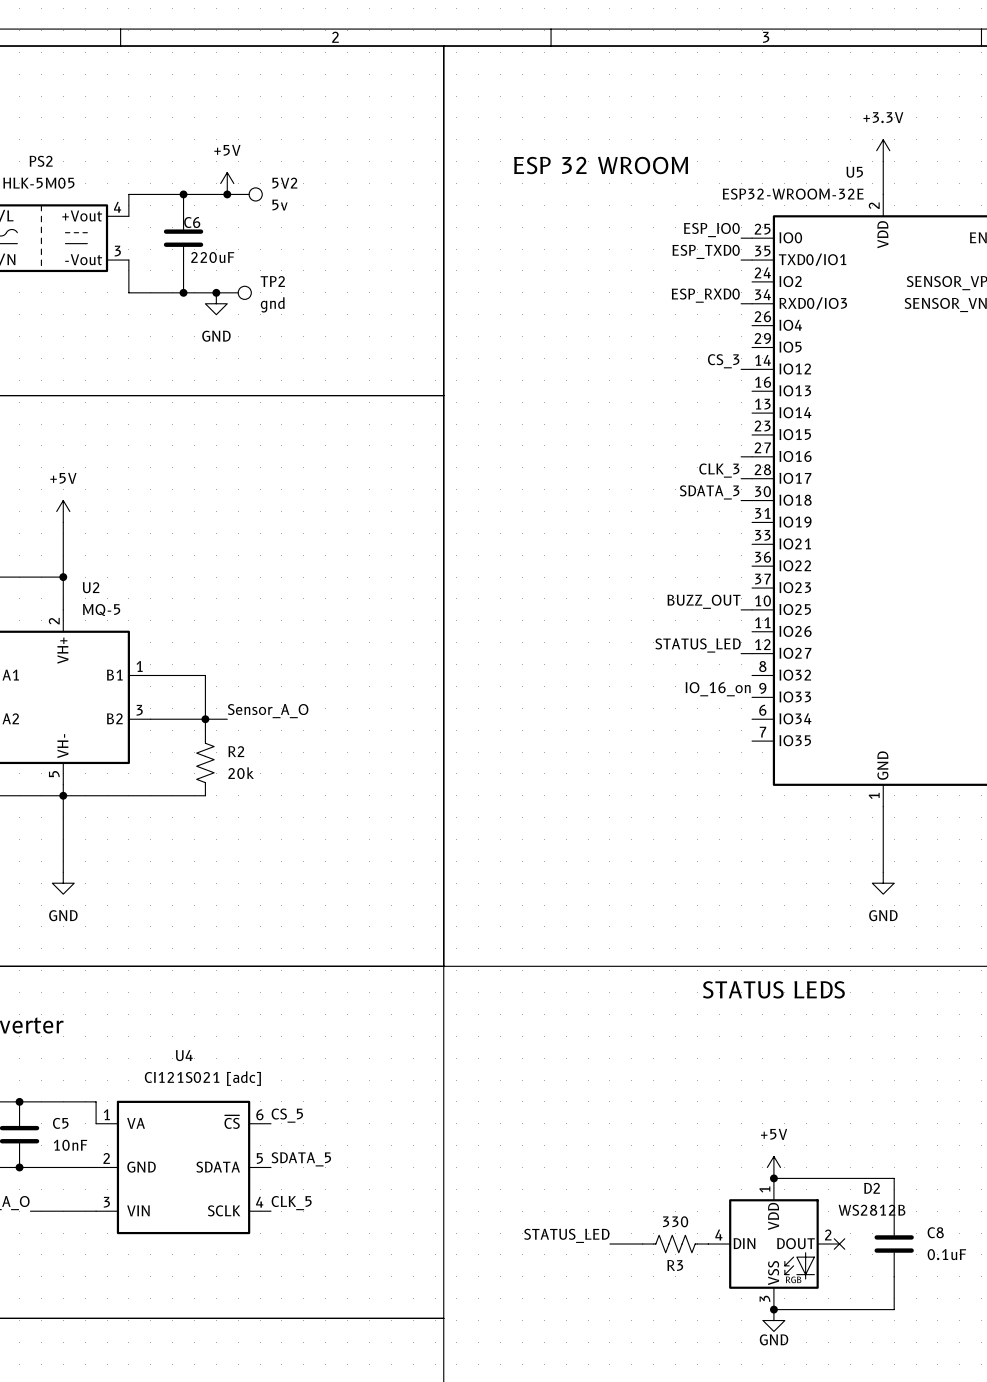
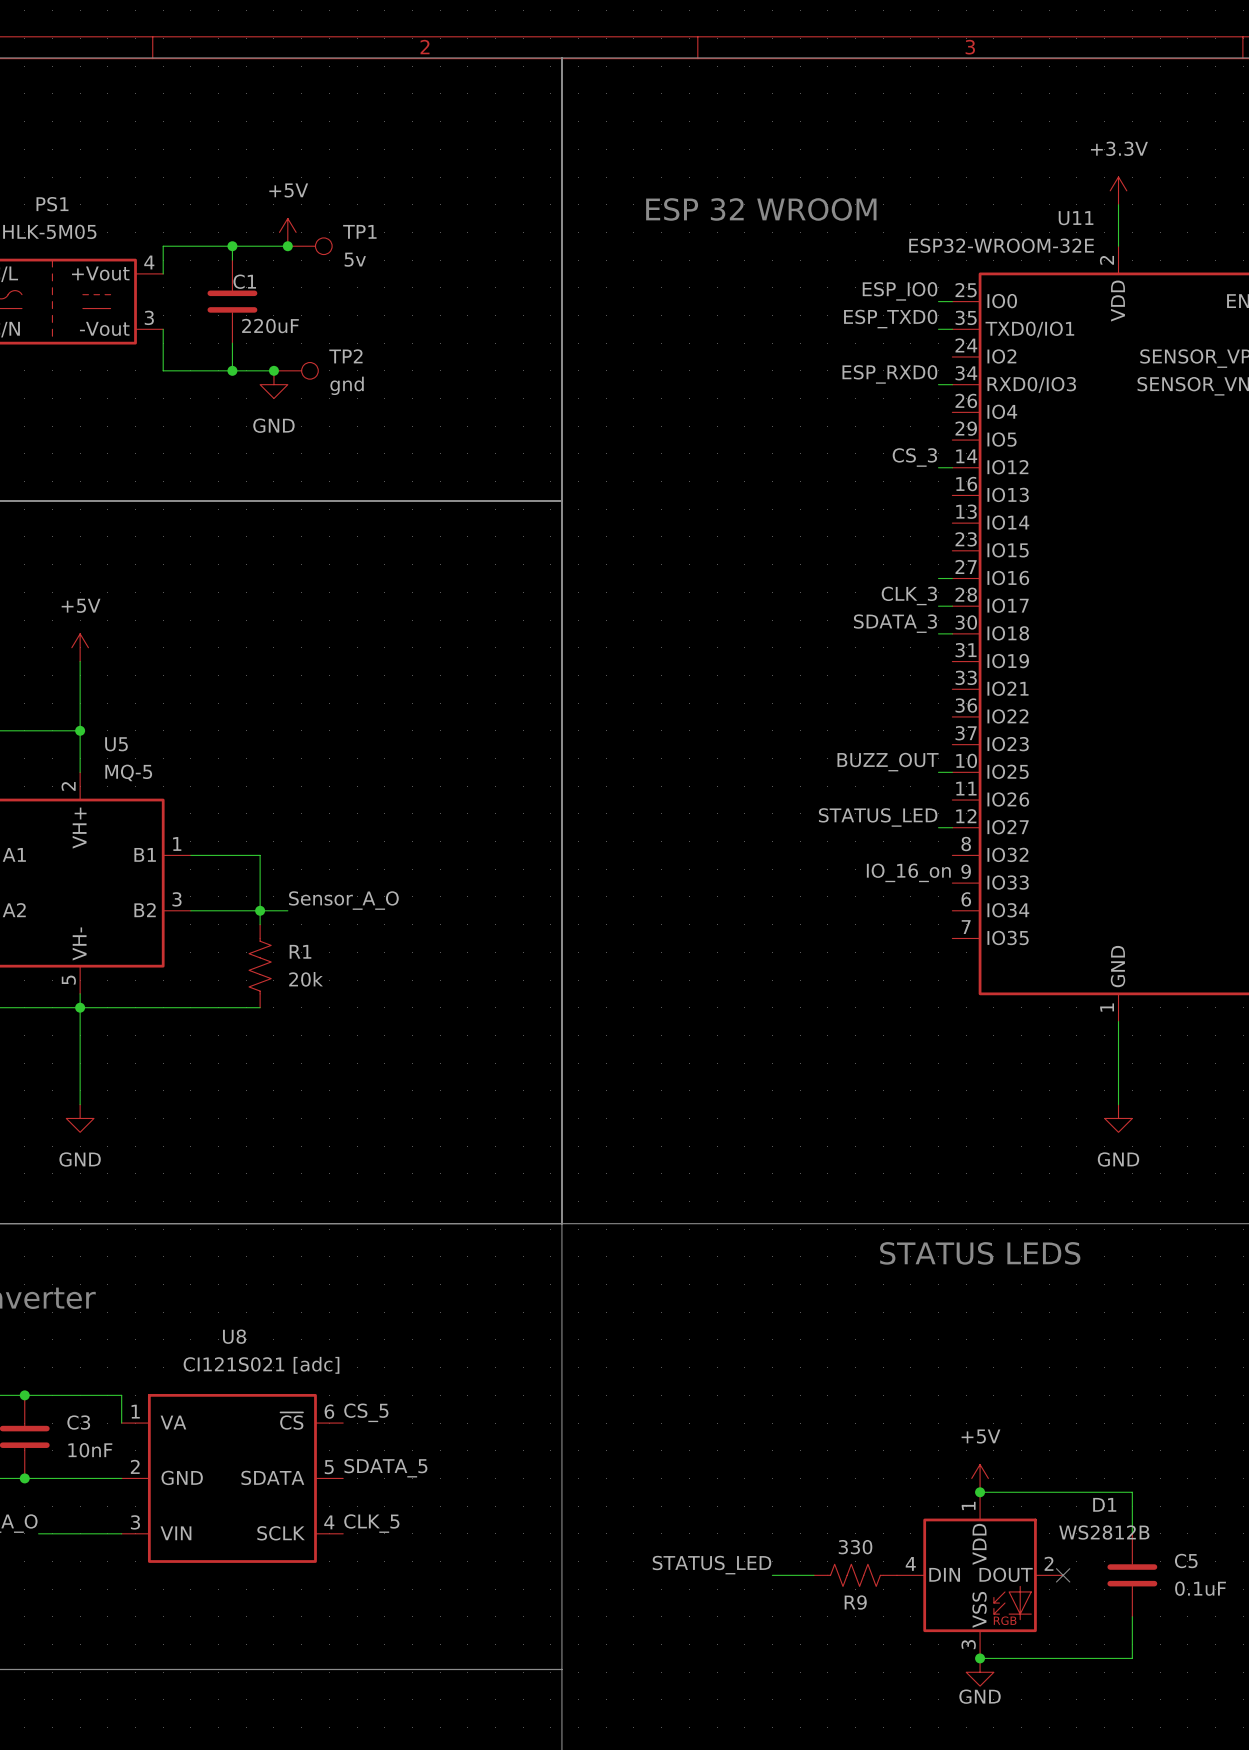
PS2 name: PS2 (41, 161) -> PS1 (52, 204)
U5 name: U5 (854, 172) -> U11 (1076, 218)
5V2 name: 5V2 (284, 183) -> TP1 (359, 231)
C6 name: C6 (192, 222) -> C1 (244, 281)
U2 name: U2 (91, 587) -> U5 (116, 744)
R2 name: R2 (236, 751) -> R1 (300, 951)
U4 name: U4 (184, 1055) -> U8 (234, 1336)
C5 name: C5 (60, 1123) -> C3 (78, 1422)
D2 name: D2 (872, 1188) -> D1 (1104, 1504)
C8 name: C8 (935, 1232) -> C5 (1186, 1560)
R3 name: R3 (675, 1265) -> R9 (855, 1602)

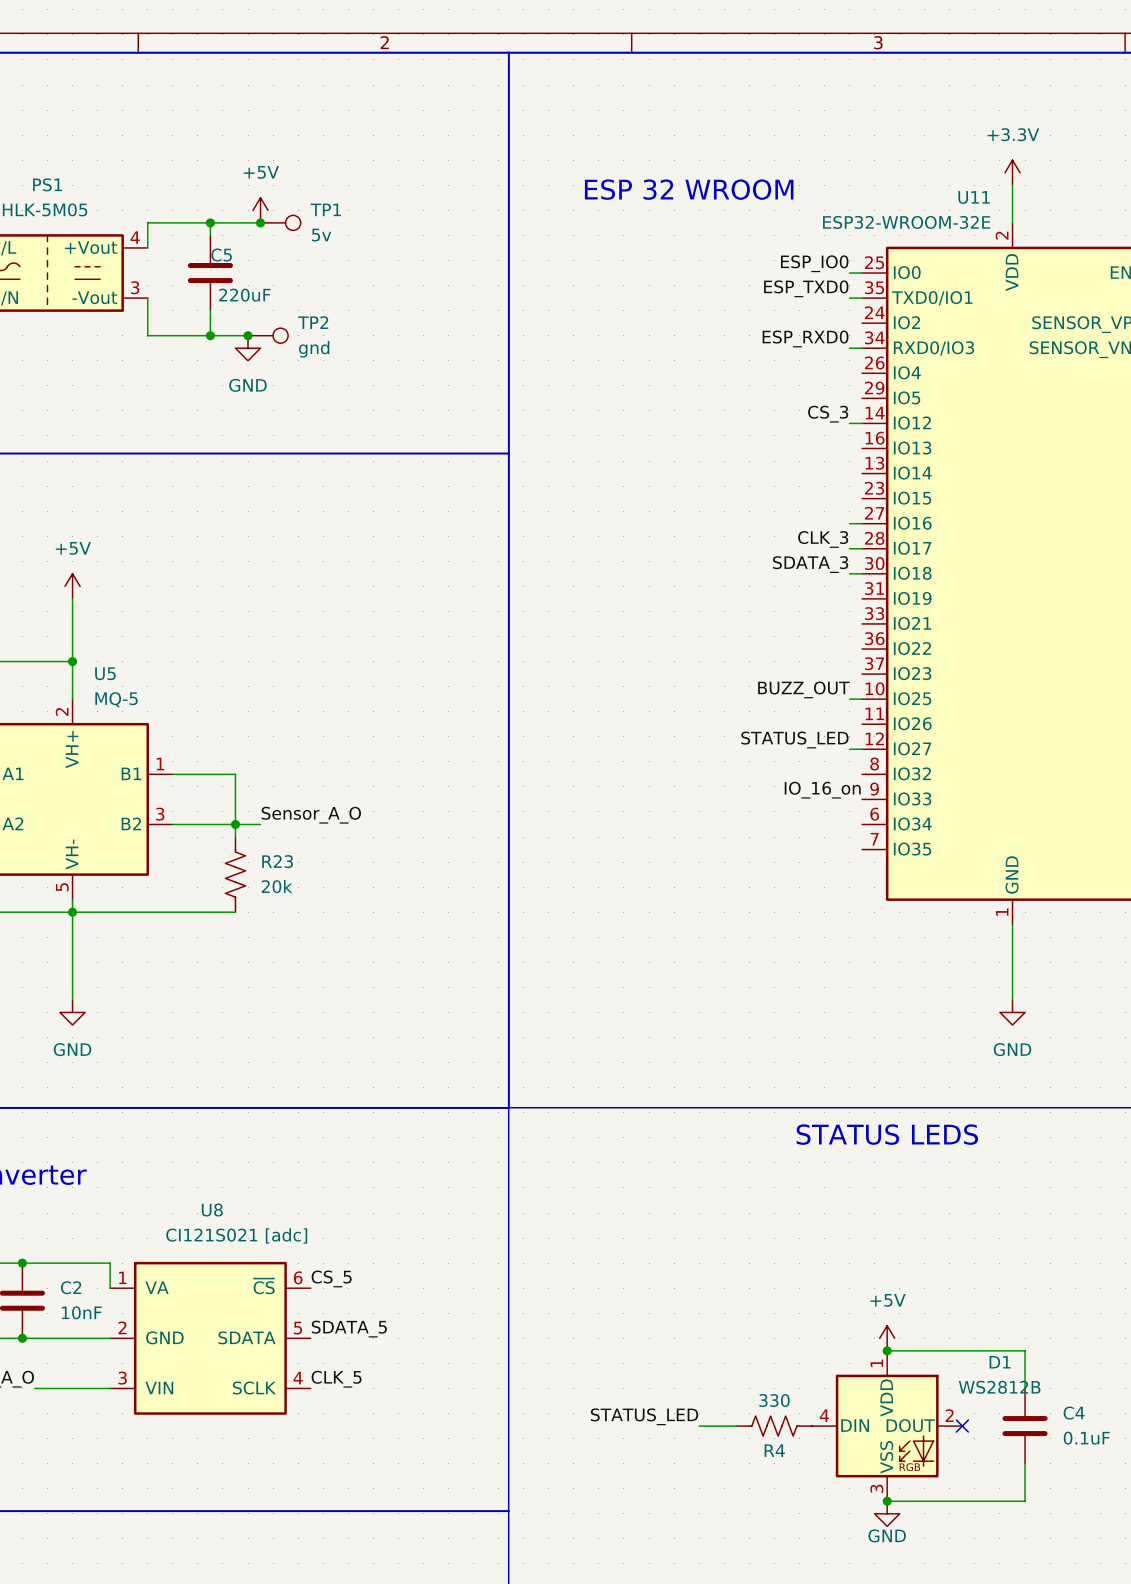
C1 name: C1 (244, 281) -> C5 (221, 255)
R1 name: R1 (300, 951) -> R23 (277, 861)
C3 name: C3 (78, 1422) -> C2 (71, 1287)
C5 name: C5 (1186, 1560) -> C4 (1074, 1413)
R9 name: R9 (855, 1602) -> R4 (774, 1450)

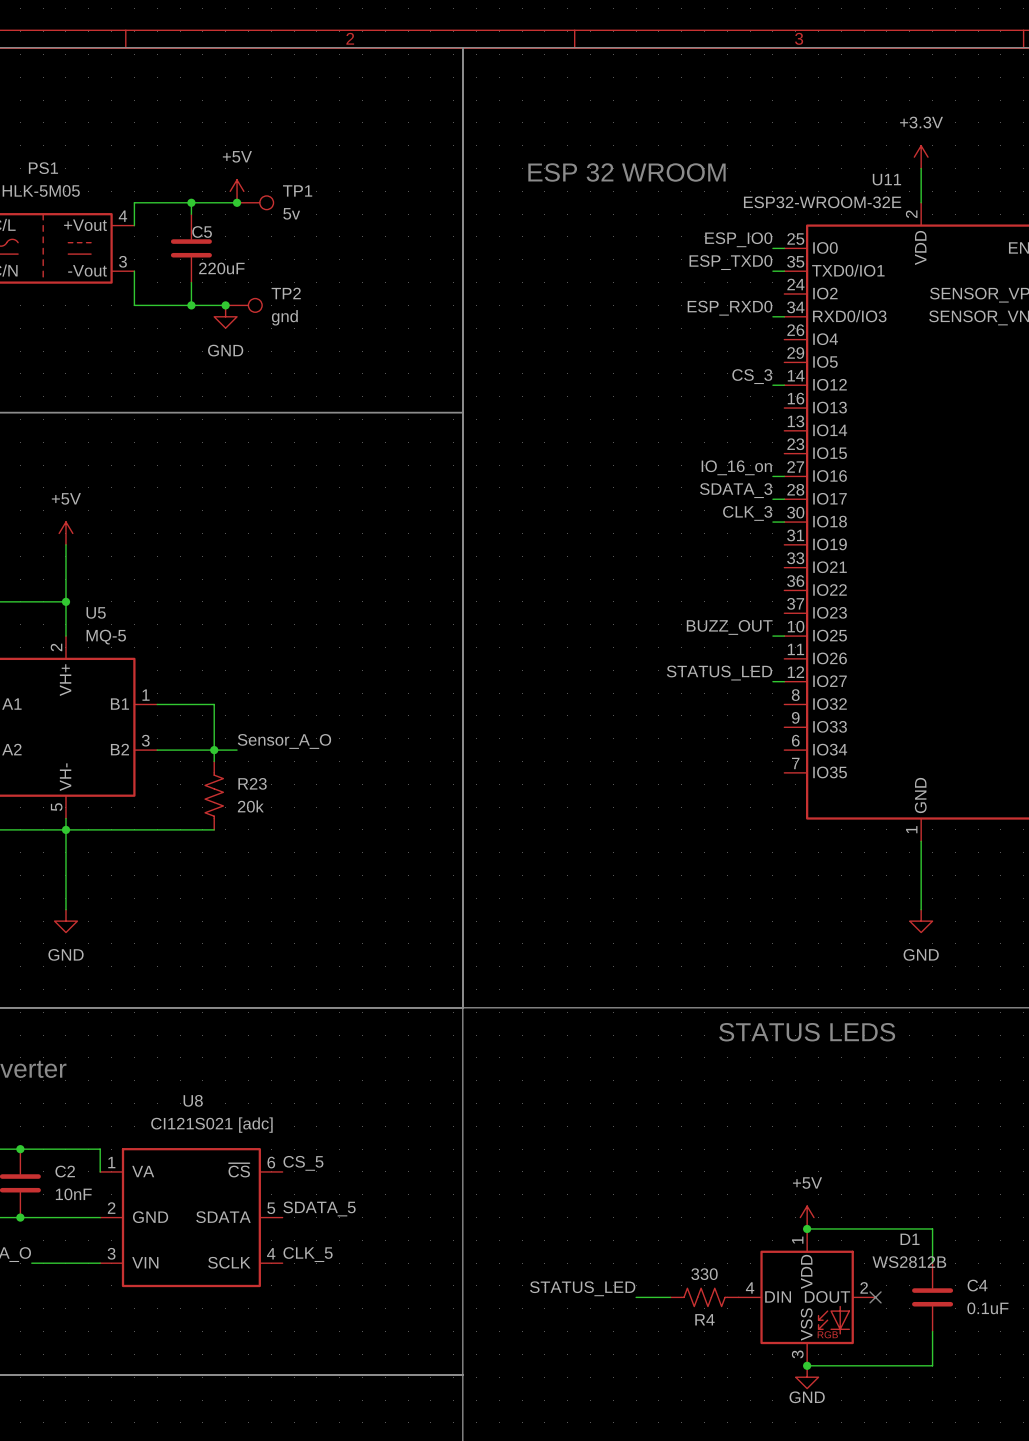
label: none -> IO_16_on (736, 467)
label: CLK_3 (823, 539) -> SDATA_3 (736, 490)
label: SDATA_3 (810, 564) -> CLK_3 (747, 513)
label: IO_16_on (822, 790) -> none

